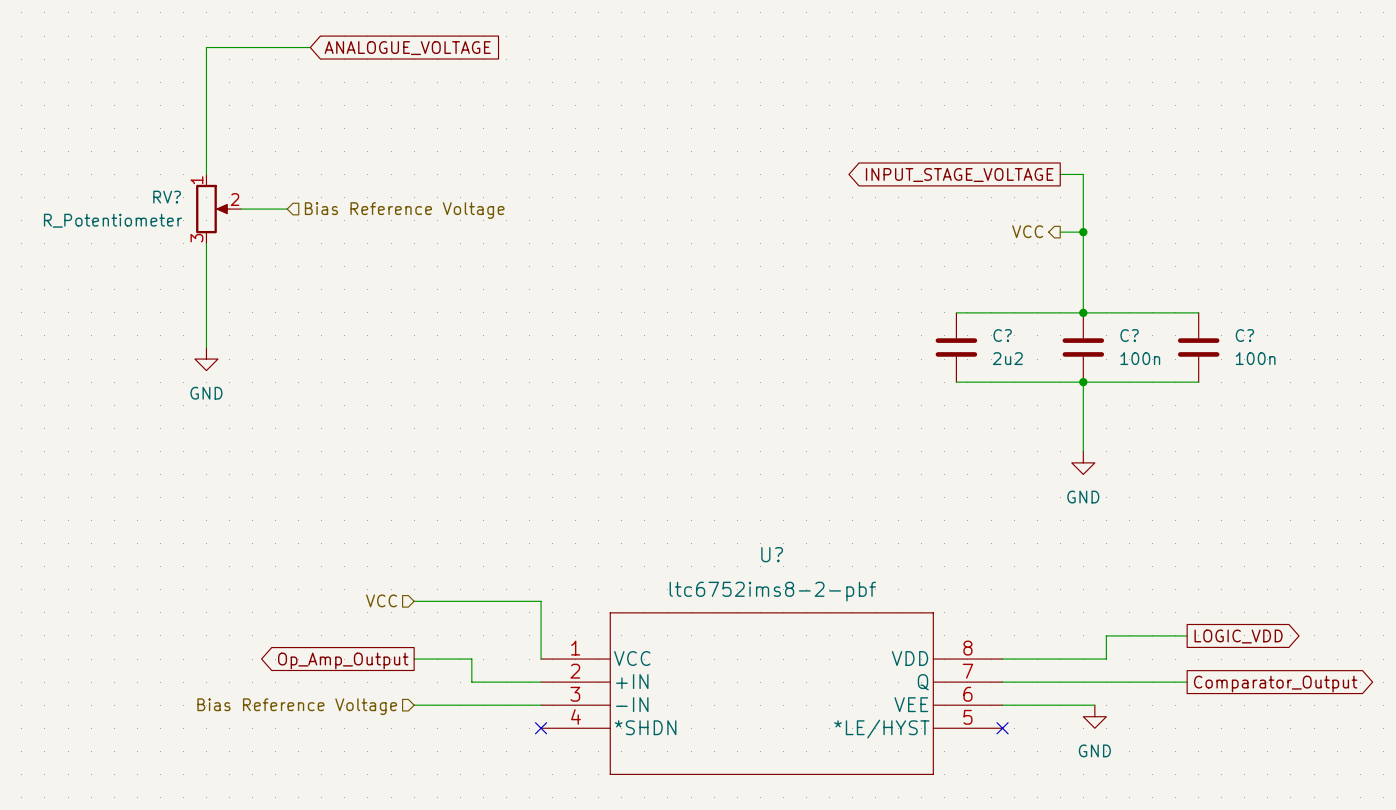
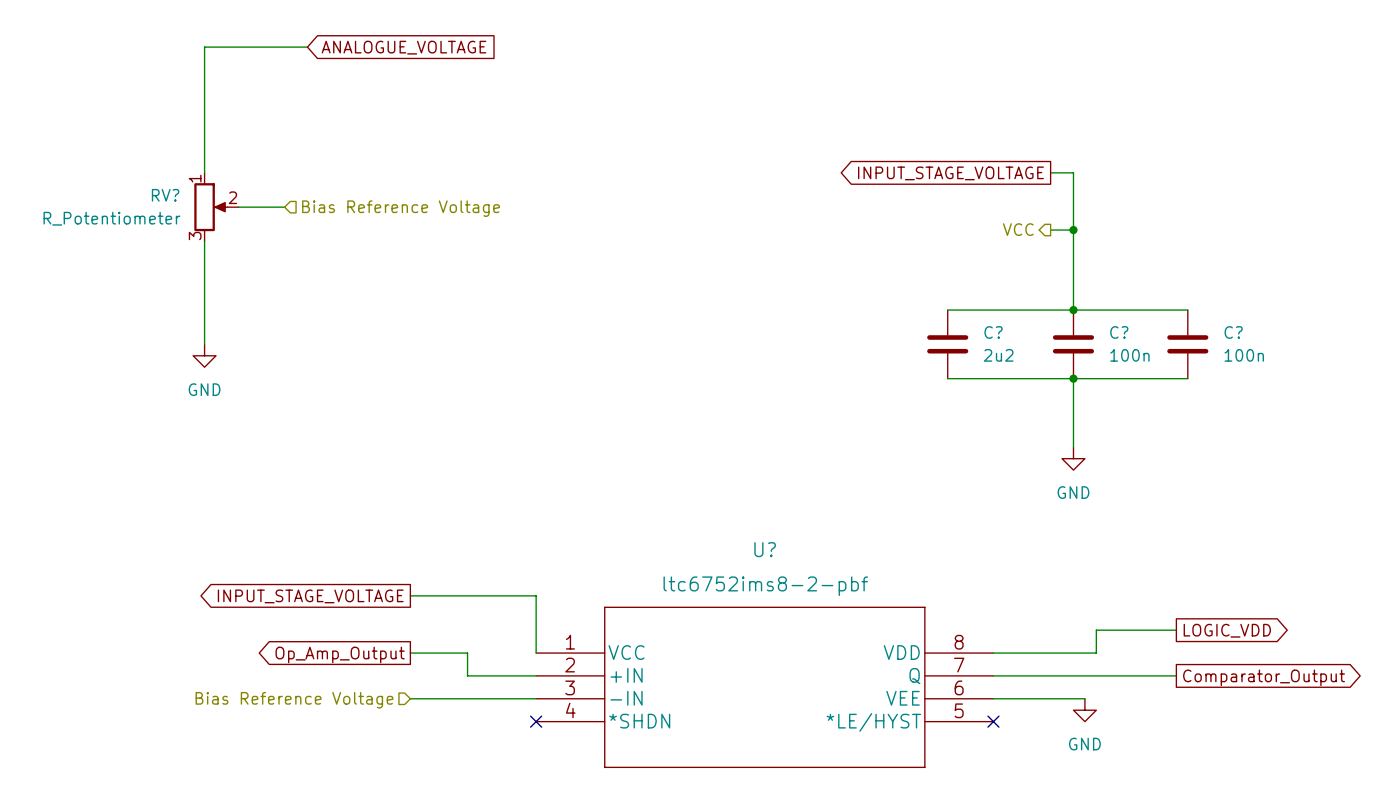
hierarchical label: VCC (381, 600) -> none
global label: none -> INPUT_STAGE_VOLTAGE (310, 596)

